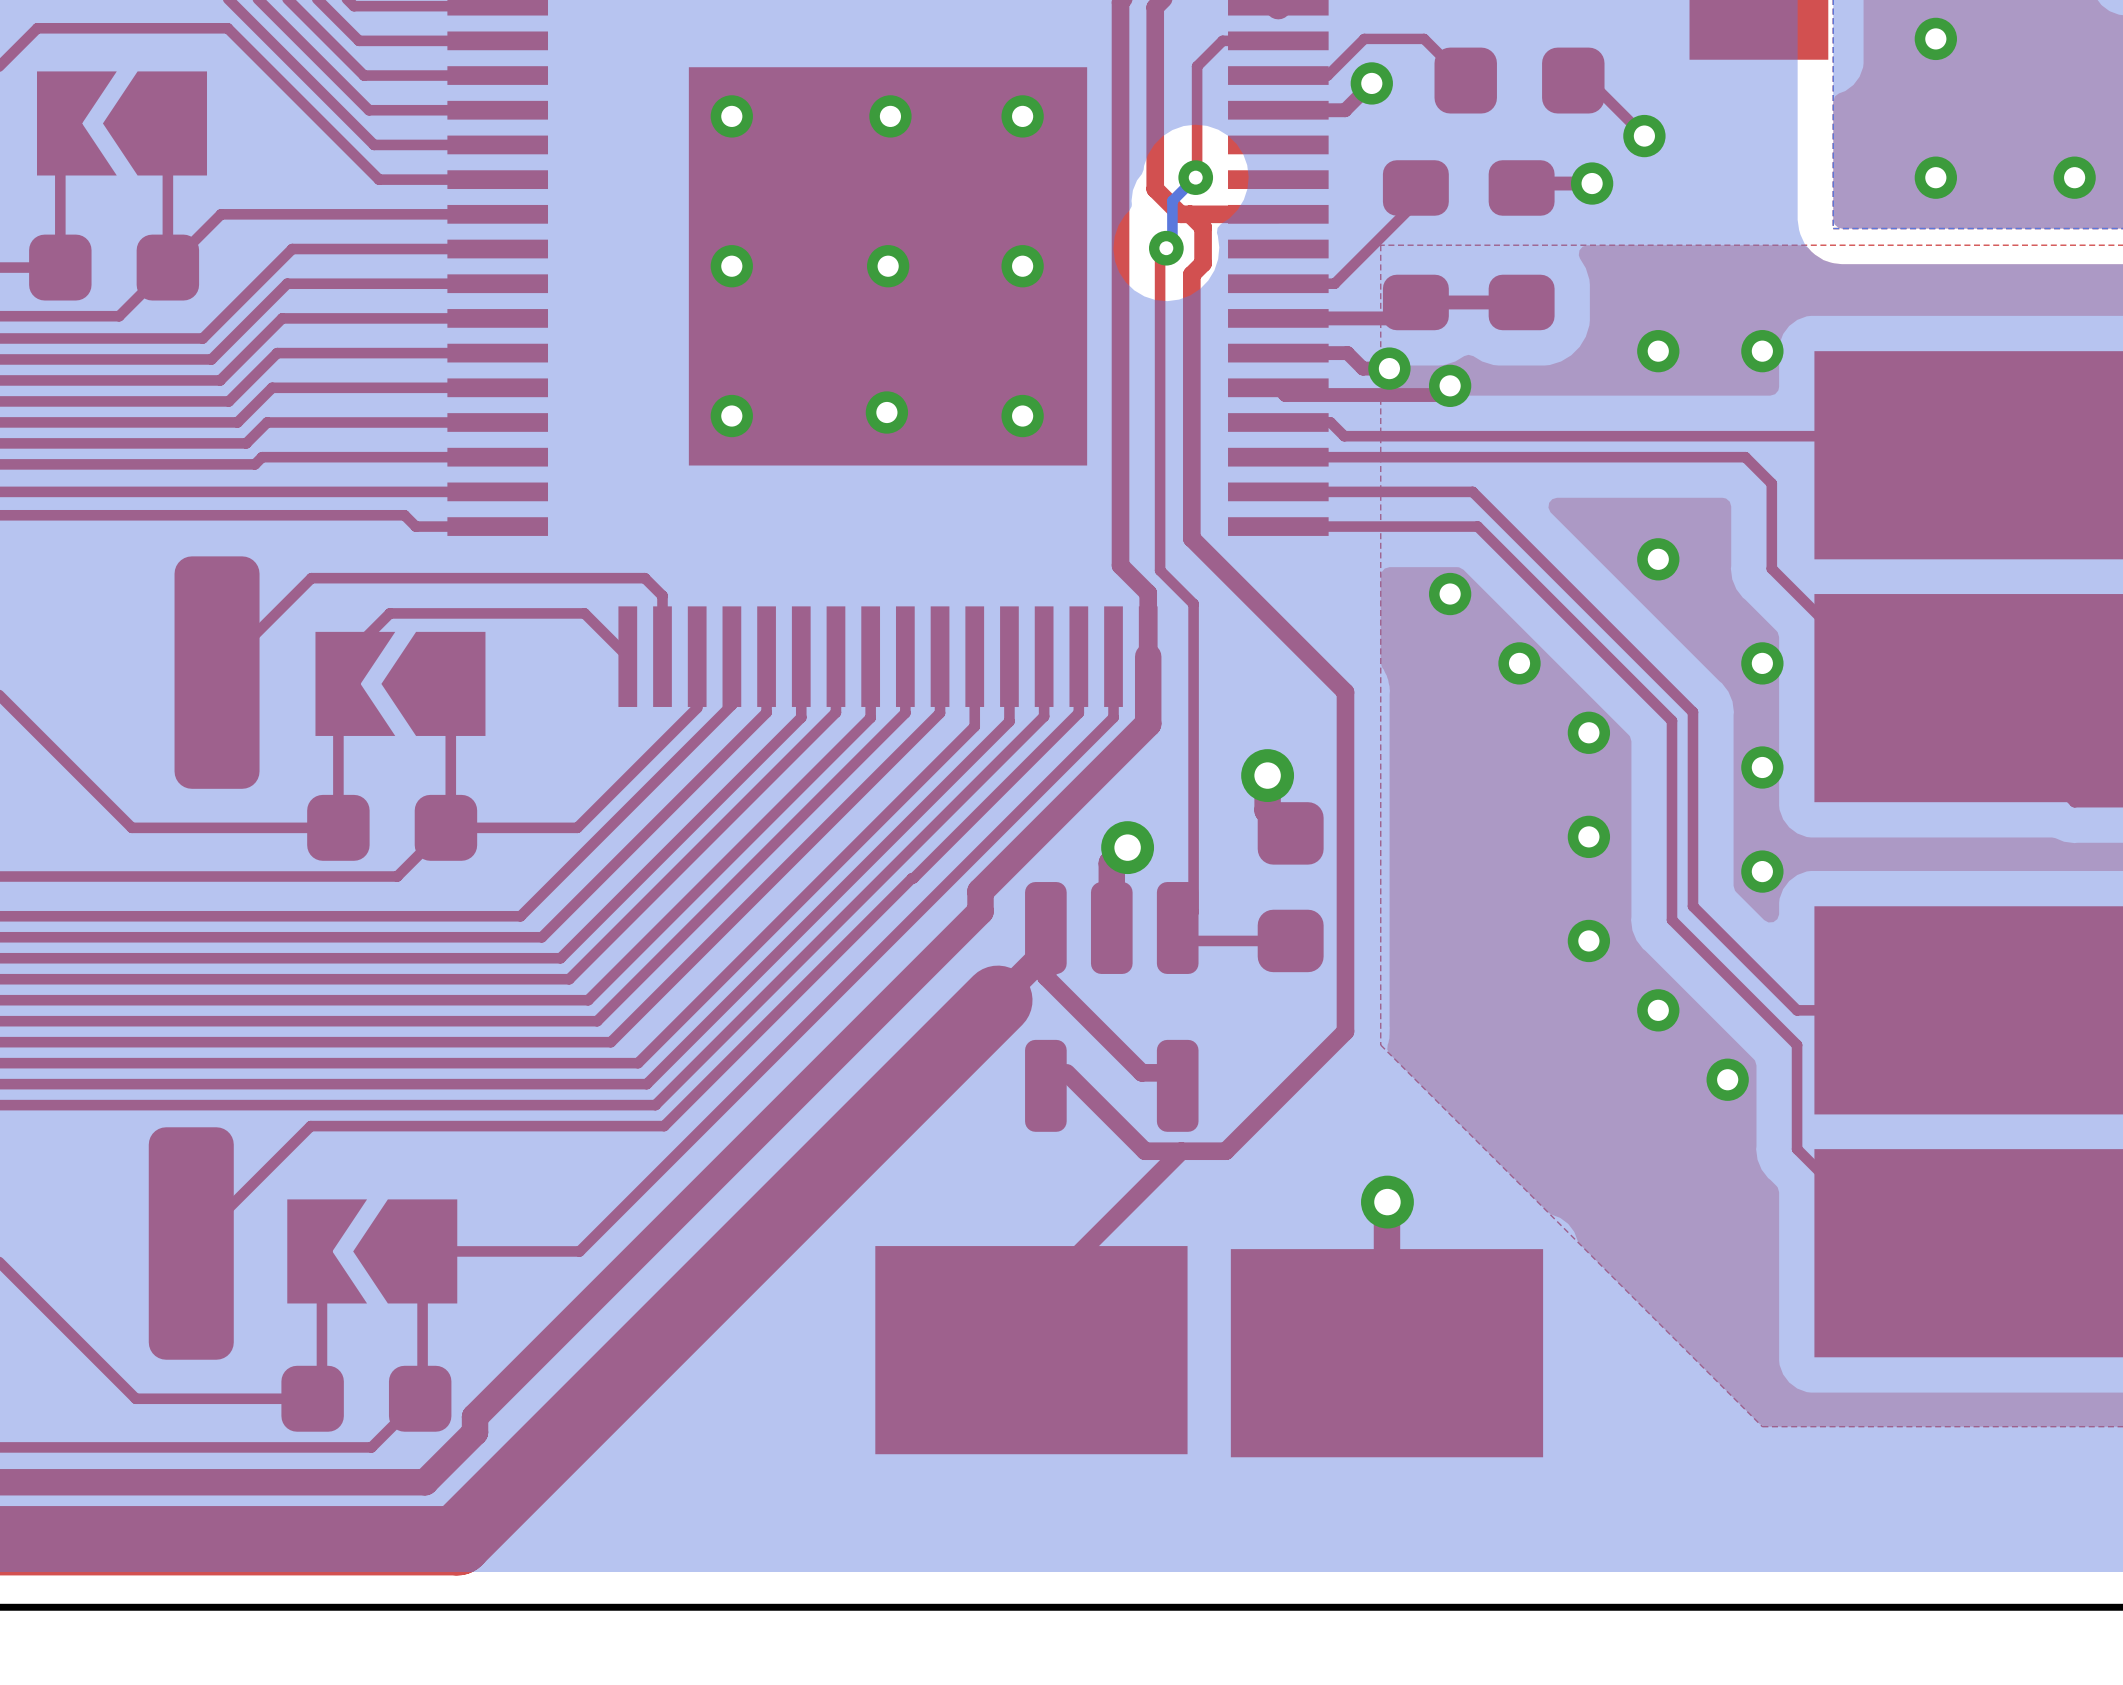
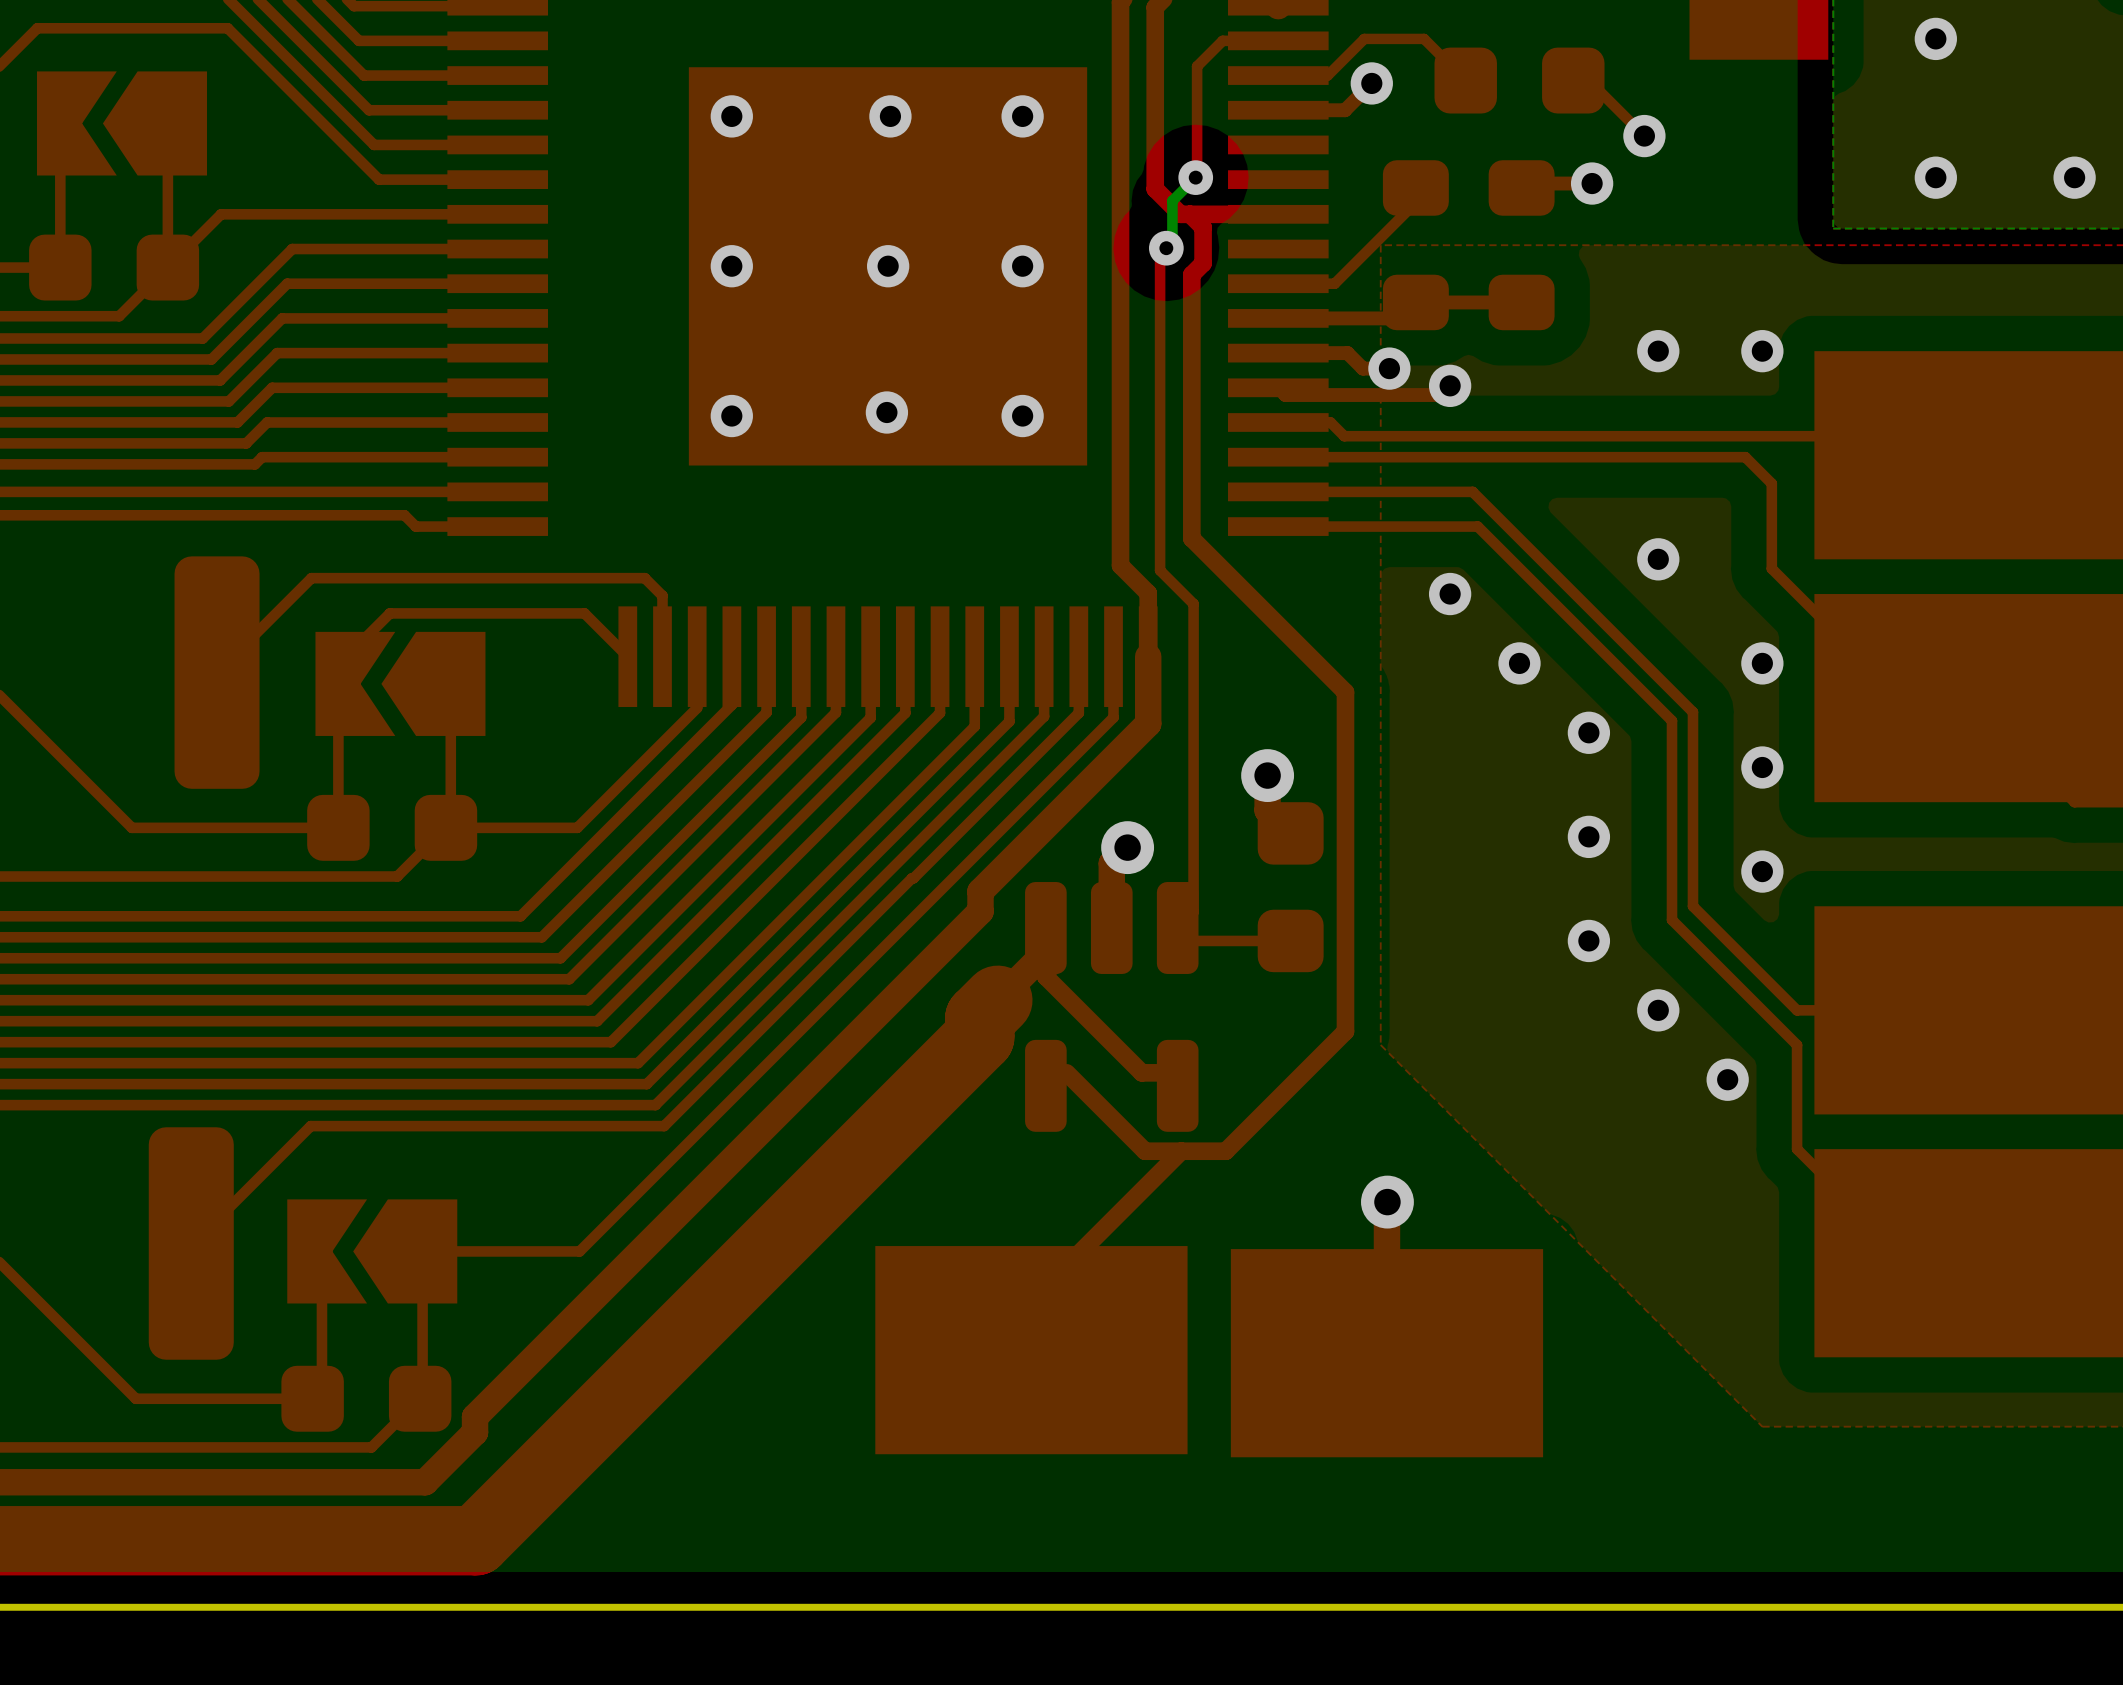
top track: (979, 1018) (457, 1540) -> (979, 1018) (979, 1036) (475, 1540) (457, 1540)

